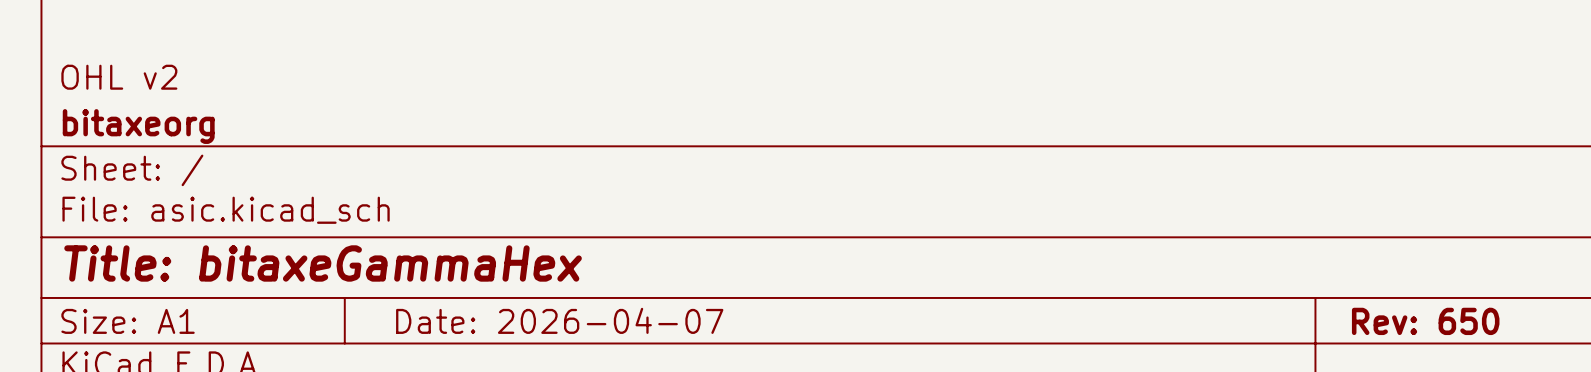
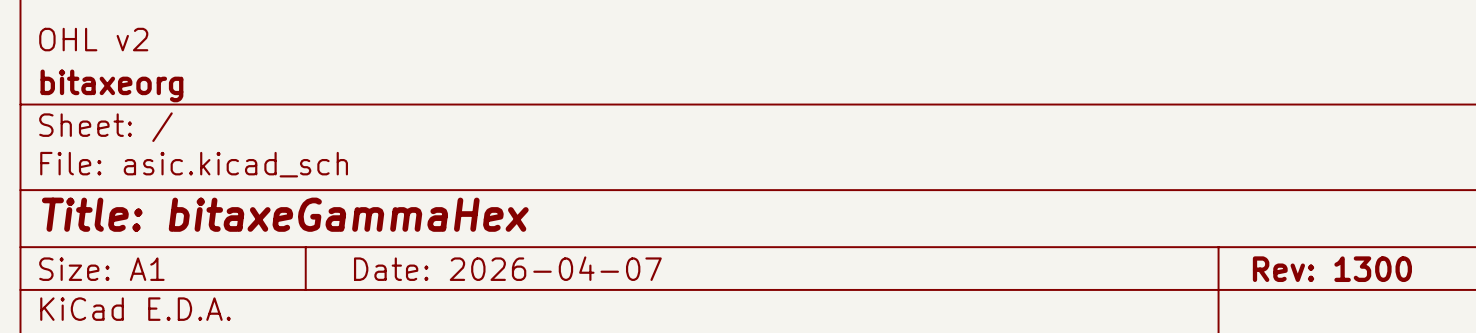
title block: Rev: 650 (1425, 321) -> Rev: 1300 (1332, 269)

